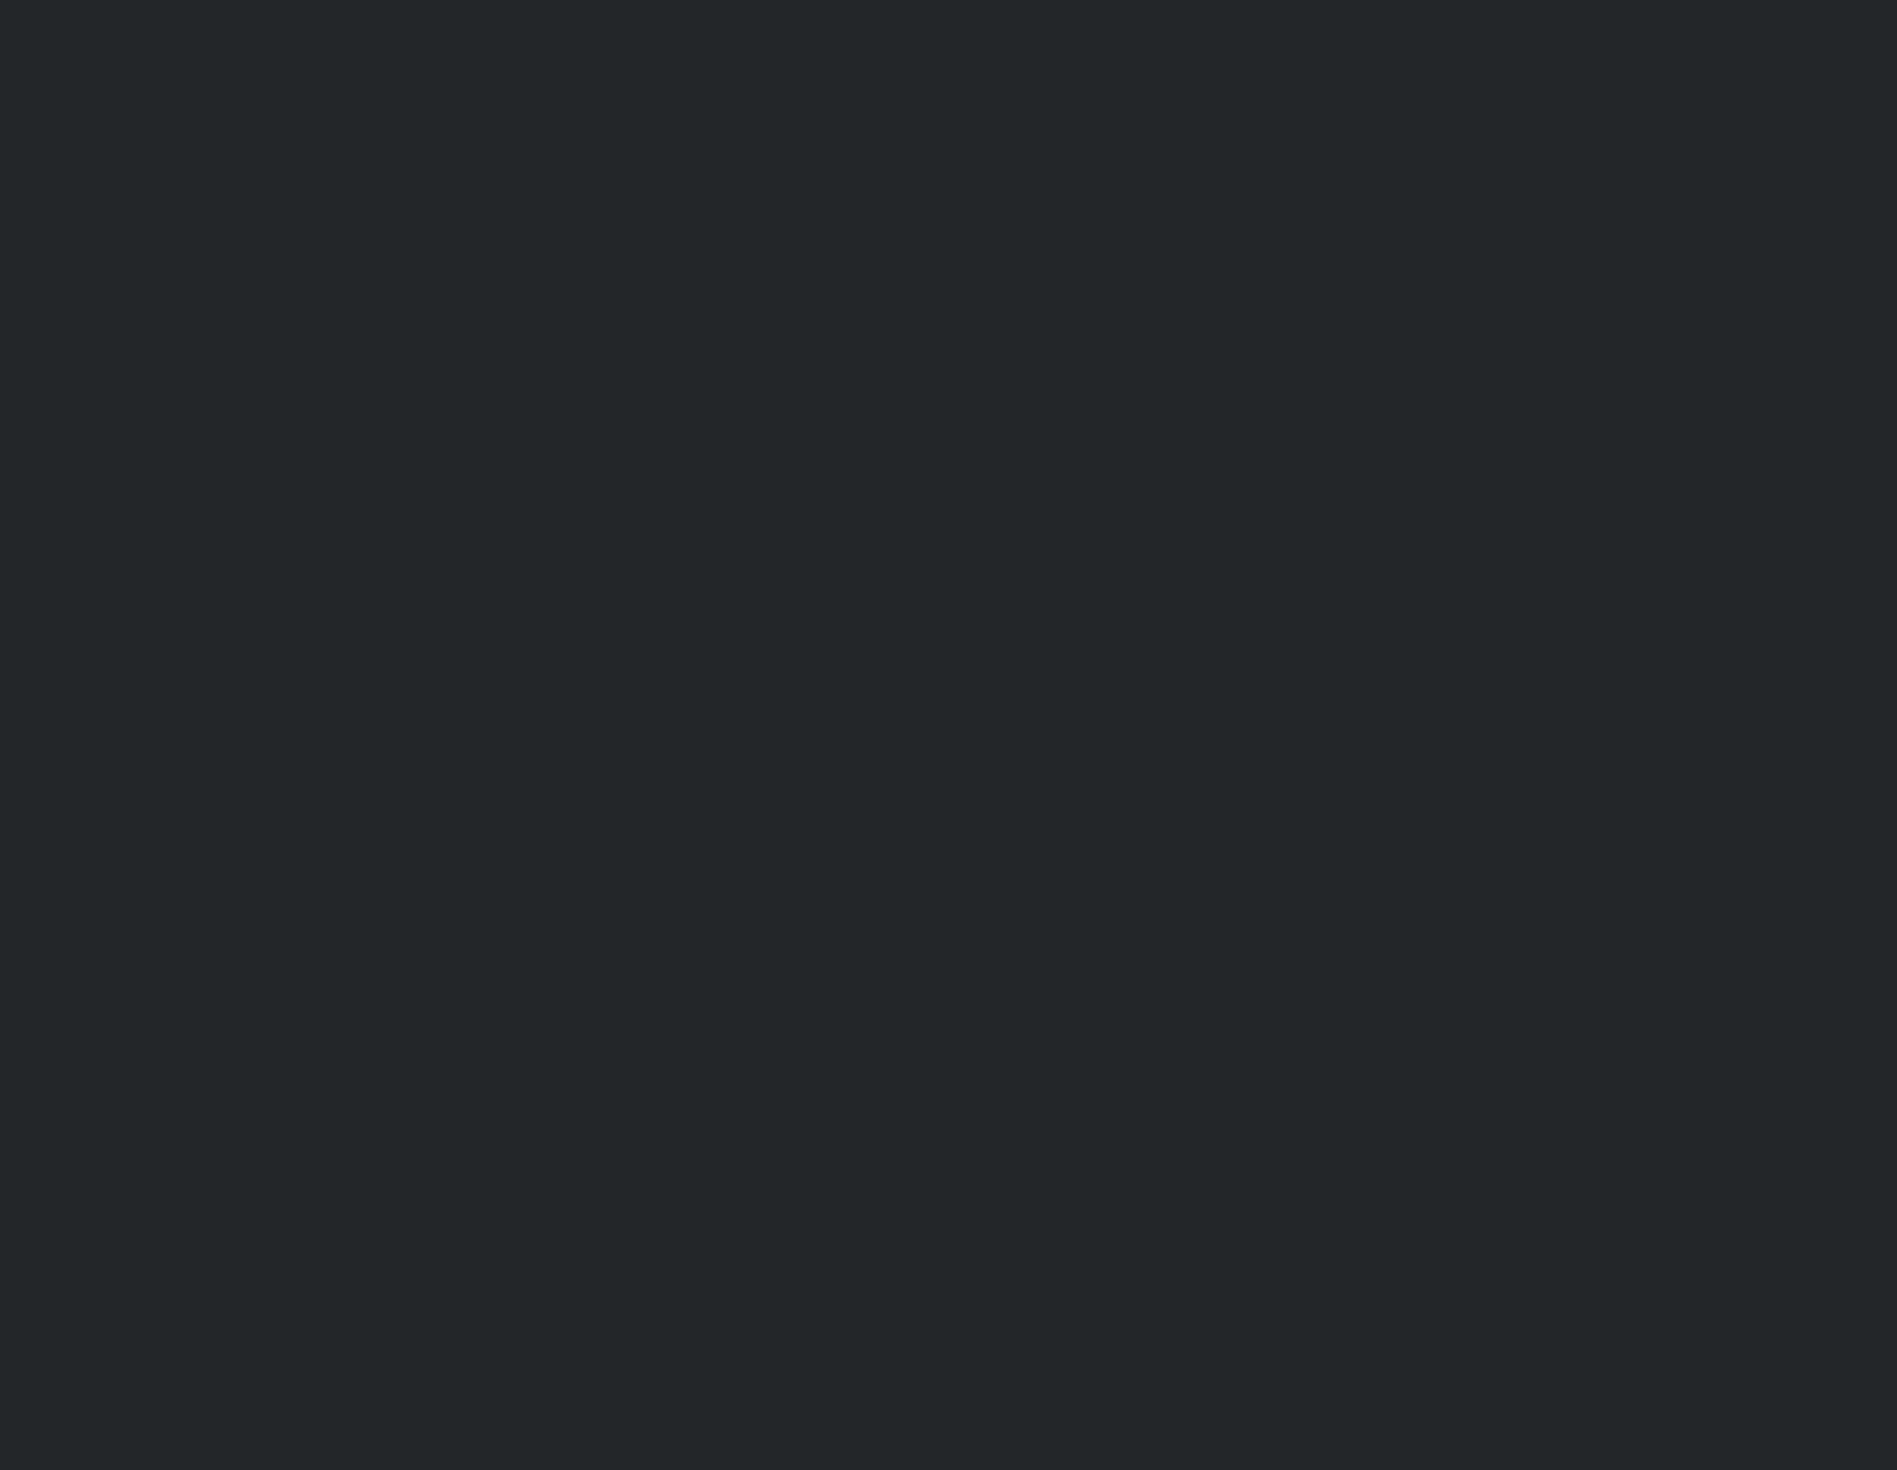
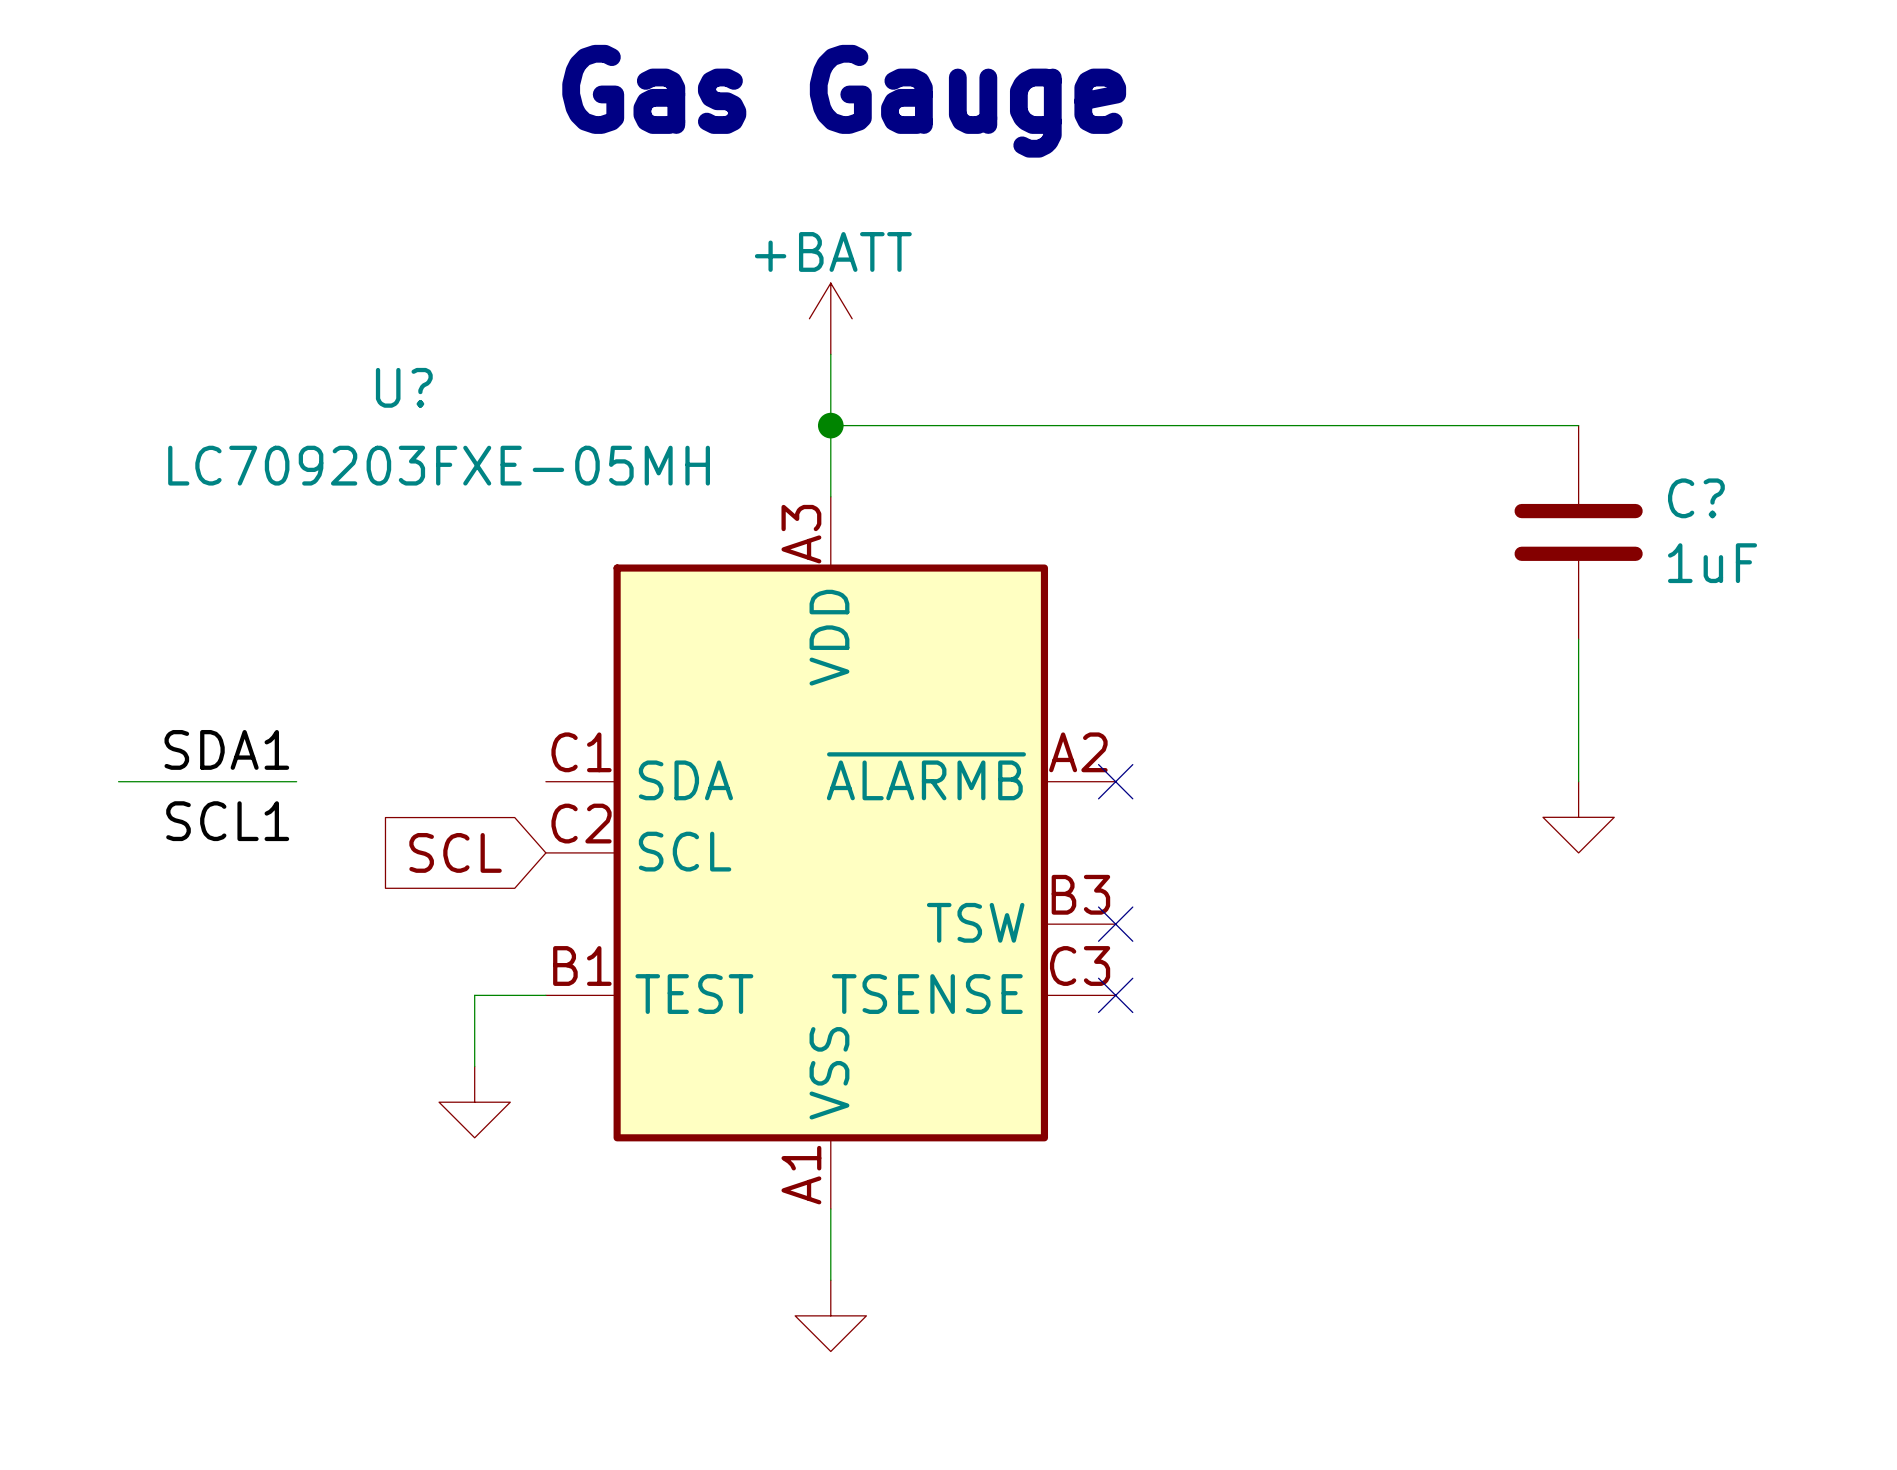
text: none -> Gas Gauge (844, 101)
power symbol: none -> +BATT (830, 318)
wire: none -> (830, 354) (830, 496)
wire: none -> (830, 425) (1578, 425)
junction: none -> (830, 425)
C?: none -> 1uF (1578, 532)
wire: none -> (1578, 639) (1578, 781)
label: none -> SDA1 (226, 749)
wire: none -> (118, 781) (296, 781)
no-connect mark: none -> (1115, 781)
power symbol: none -> (1578, 817)
label: none -> SCL1 (227, 821)
global label: none -> SCL (455, 852)
U?: none -> LC709203FXE-05MH (830, 852)
no-connect mark: none -> (1115, 924)
wire: none -> (545, 995) (474, 995) (474, 1066)
no-connect mark: none -> (1115, 995)
power symbol: none -> (474, 1102)
wire: none -> (830, 1209) (830, 1280)
power symbol: none -> (830, 1315)

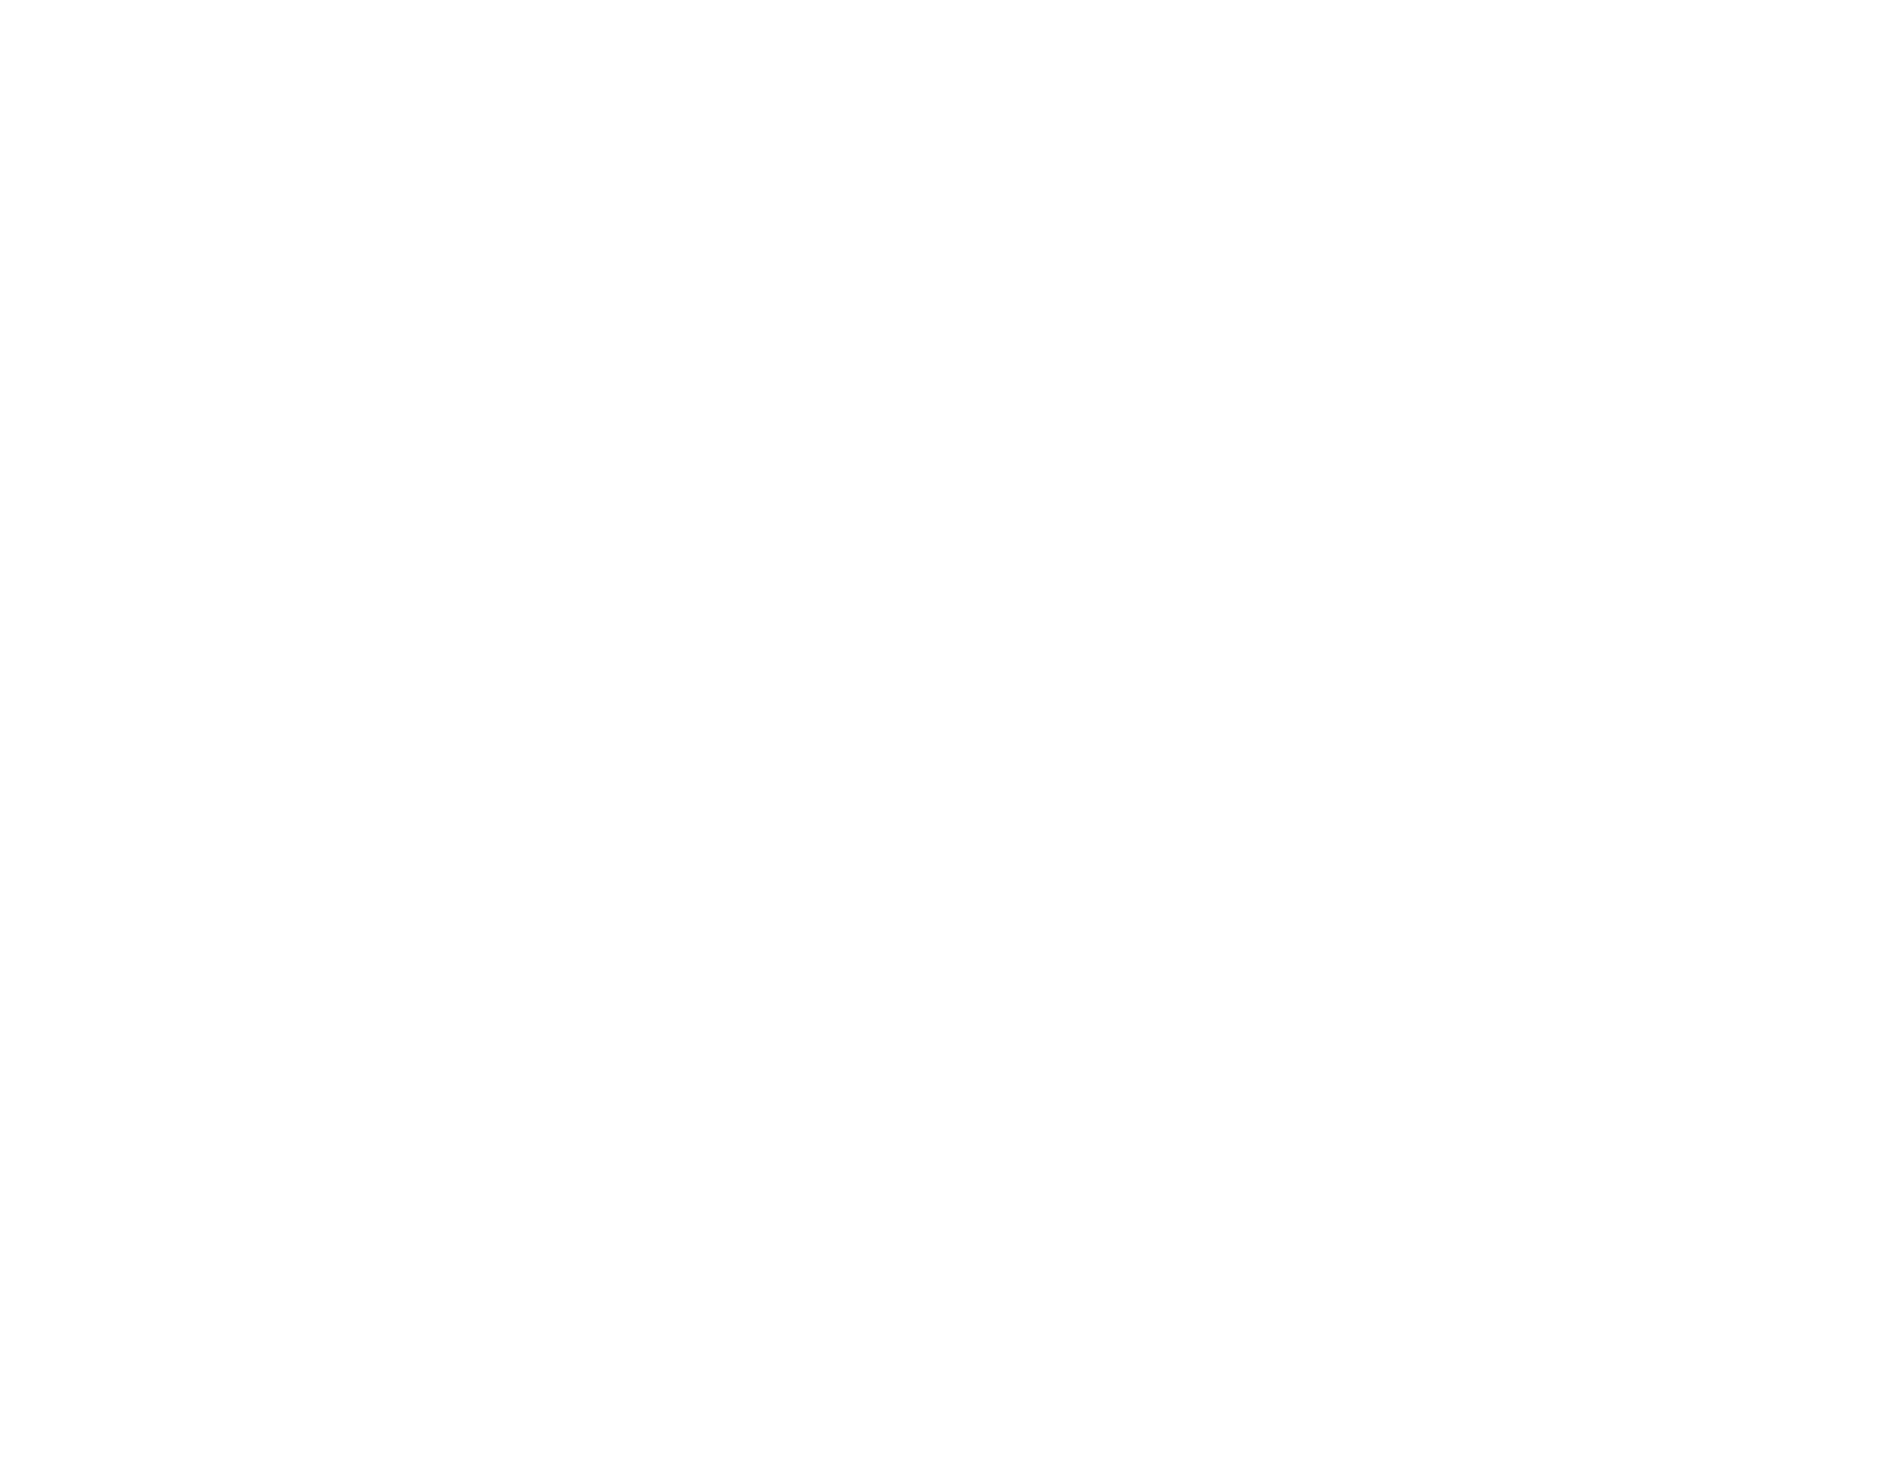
text: Gas Gauge (844, 101) -> none
power symbol: +BATT (830, 318) -> none
wire: (830, 354) (830, 496) -> none
wire: (830, 425) (1578, 425) -> none
junction: (830, 425) -> none
C?: 1uF (1578, 532) -> none
wire: (1578, 639) (1578, 781) -> none
label: SDA1 (226, 749) -> none
wire: (118, 781) (296, 781) -> none
no-connect mark: (1115, 781) -> none
power symbol: (1578, 817) -> none
label: SCL1 (227, 821) -> none
global label: SCL (455, 852) -> none
U?: LC709203FXE-05MH (830, 852) -> none
no-connect mark: (1115, 924) -> none
wire: (545, 995) (474, 995) (474, 1066) -> none
no-connect mark: (1115, 995) -> none
power symbol: (474, 1102) -> none
wire: (830, 1209) (830, 1280) -> none
power symbol: (830, 1315) -> none

